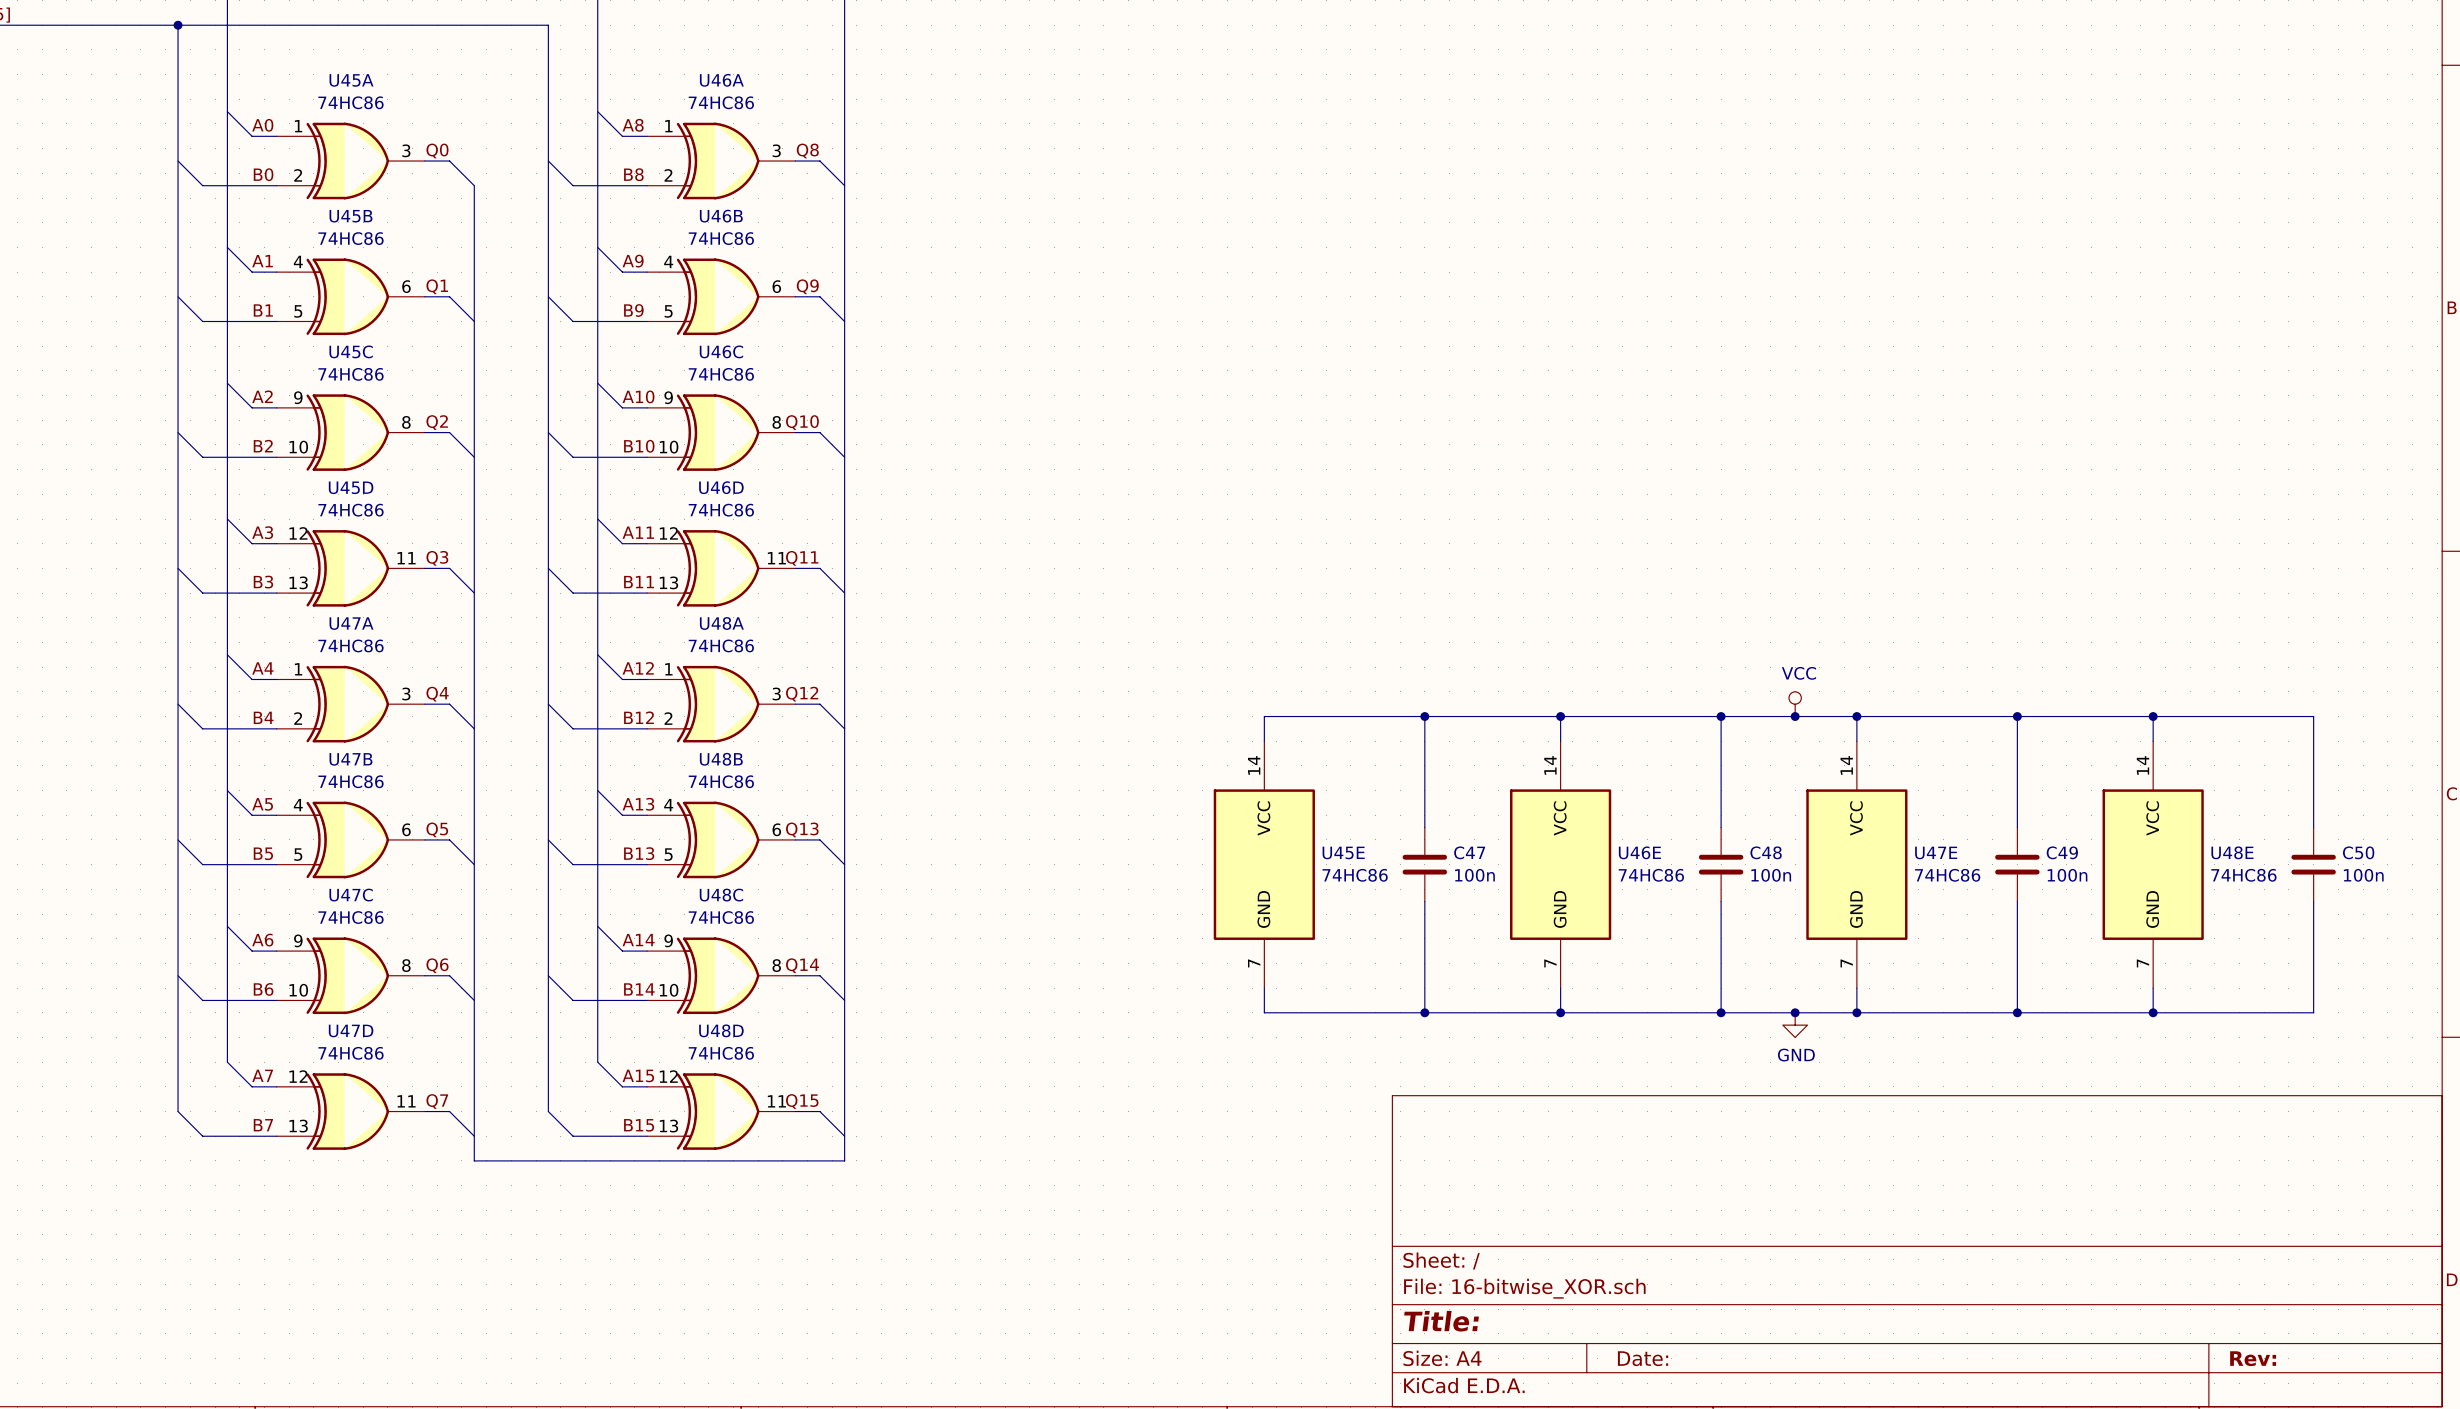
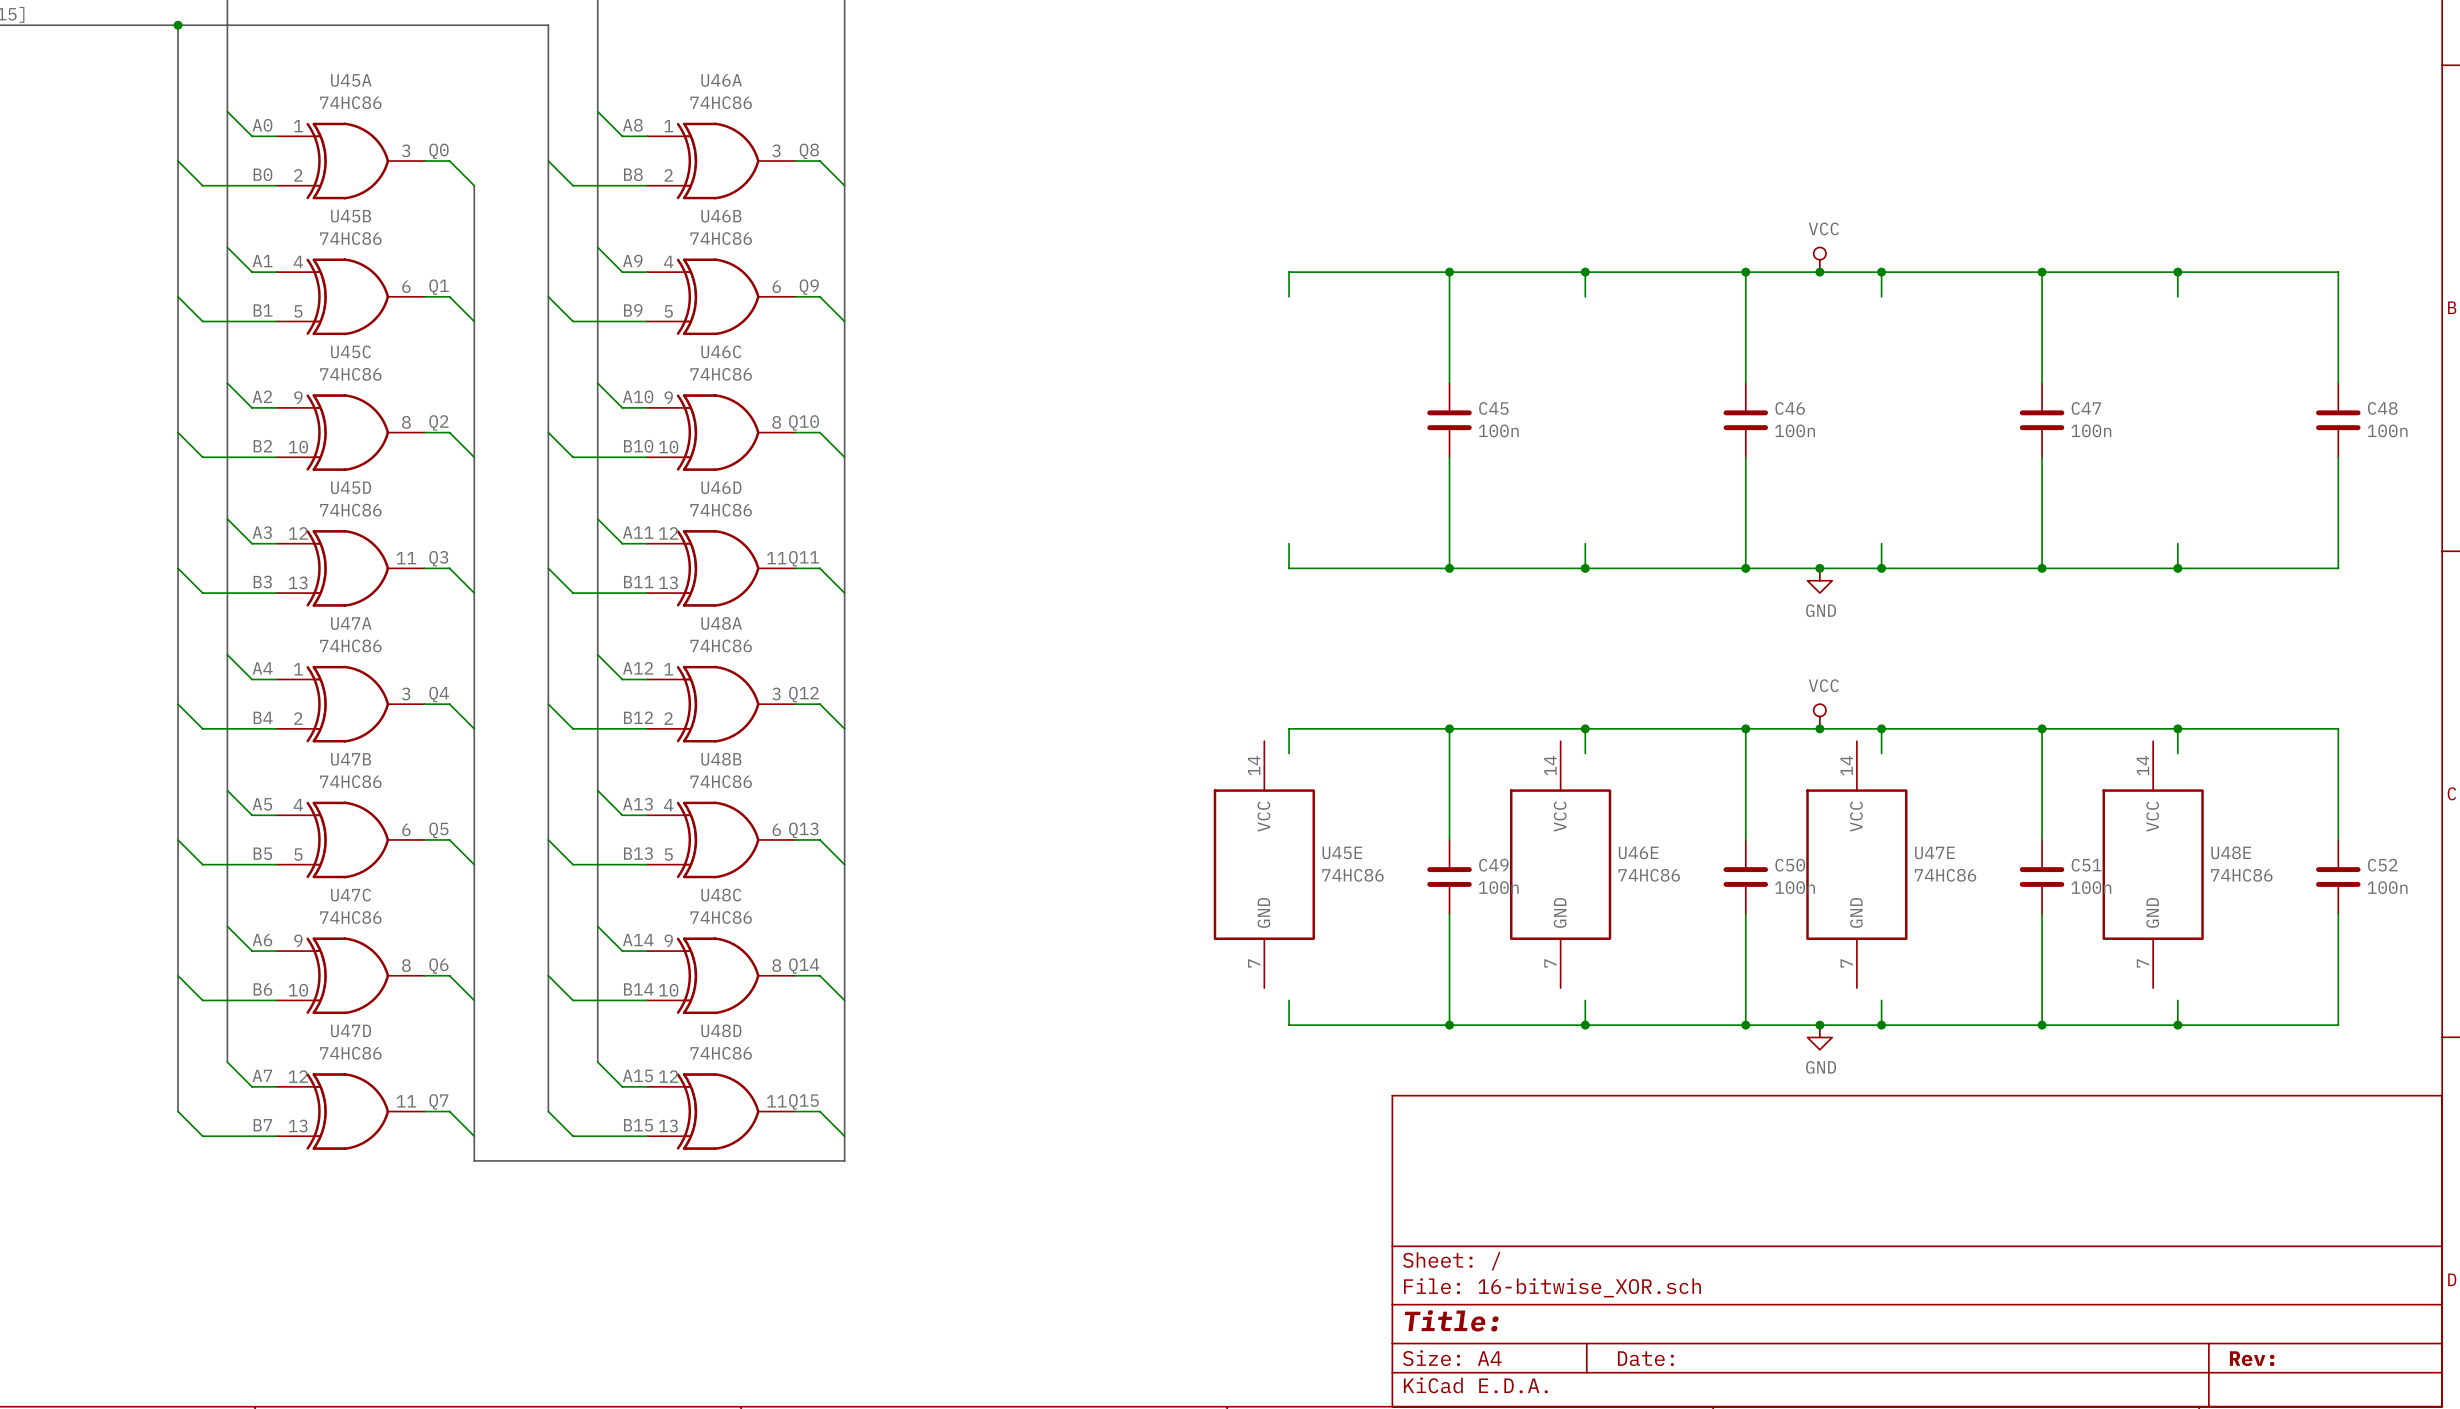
power symbol: none -> VCC (1819, 259)
wire: none -> (1449, 272) (1449, 383)
junction: none -> (1449, 272)
wire: none -> (1585, 272) (1585, 296)
junction: none -> (1585, 272)
wire: none -> (1745, 272) (1745, 383)
junction: none -> (1745, 272)
junction: none -> (1819, 272)
wire: none -> (1881, 272) (1881, 296)
junction: none -> (1881, 272)
wire: none -> (2042, 272) (2042, 383)
junction: none -> (2042, 272)
wire: none -> (2177, 272) (2177, 296)
junction: none -> (2177, 272)
wire: none -> (1289, 296) (1289, 272) (2338, 272) (2338, 383)
C45: none -> 100n (1449, 420)
C46: none -> 100n (1745, 420)
wire: none -> (1449, 457) (1449, 568)
wire: none -> (1745, 457) (1745, 568)
wire: none -> (2042, 457) (2042, 568)
wire: none -> (2338, 457) (2338, 568) (1289, 568) (1289, 543)
wire: none -> (1585, 543) (1585, 568)
wire: none -> (1881, 543) (1881, 568)
wire: none -> (2177, 543) (2177, 568)
junction: none -> (1449, 568)
junction: none -> (1585, 568)
junction: none -> (1745, 568)
junction: none -> (1819, 568)
junction: none -> (1881, 568)
junction: none -> (2042, 568)
junction: none -> (2177, 568)
power symbol: none -> GND (1819, 580)
power symbol position: VCC (1795, 704) -> VCC (1819, 716)
wire: (1424, 716) (1424, 827) -> (1449, 728) (1449, 839)
junction position: (1424, 716) -> (1449, 728)
wire: (1560, 716) (1560, 741) -> (1585, 728) (1585, 753)
junction position: (1560, 716) -> (1585, 728)
wire: (1721, 716) (1721, 827) -> (1745, 728) (1745, 839)
junction: (1721, 716) -> none
junction: (1795, 716) -> none
wire: (1856, 716) (1856, 741) -> (1881, 728) (1881, 753)
junction: (1856, 716) -> none
wire: (2017, 716) (2017, 827) -> (2042, 728) (2042, 839)
junction position: (2017, 716) -> (2042, 728)
wire: (2153, 716) (2153, 741) -> (2177, 728) (2177, 753)
junction position: (2153, 716) -> (2177, 728)
junction: none -> (1745, 728)
junction: none -> (1819, 728)
junction: none -> (1881, 728)
wire: (1264, 741) (1264, 716) (2313, 716) (2313, 827) -> (1289, 753) (1289, 728) (2338, 728) (2338, 839)
C47 position: (1424, 864) -> (2042, 420)
C48 position: (1721, 864) -> (2338, 420)
C49 position: (2017, 864) -> (1449, 877)
C50 position: (2313, 864) -> (1745, 877)
C51: none -> 100n (2042, 877)
C52: none -> 100n (2338, 877)
wire: (1424, 901) (1424, 1012) -> (1449, 914) (1449, 1025)
wire: (1721, 901) (1721, 1012) -> (1745, 914) (1745, 1025)
wire: (2017, 901) (2017, 1012) -> (2042, 914) (2042, 1025)
wire: (2313, 901) (2313, 1012) (1264, 1012) (1264, 988) -> (2338, 914) (2338, 1025) (1289, 1025) (1289, 1000)
wire: (1560, 988) (1560, 1012) -> (1585, 1000) (1585, 1025)
wire: (1856, 988) (1856, 1012) -> (1881, 1000) (1881, 1025)
wire: (2153, 988) (2153, 1012) -> (2177, 1000) (2177, 1025)
junction position: (1424, 1012) -> (1449, 1025)
junction position: (1560, 1012) -> (1585, 1025)
junction: (1721, 1012) -> none
junction: (1795, 1012) -> none
junction: (1856, 1012) -> none
junction position: (2017, 1012) -> (2042, 1025)
junction position: (2153, 1012) -> (2177, 1025)
junction: none -> (1745, 1025)
power symbol position: GND (1795, 1025) -> GND (1819, 1037)
junction: none -> (1819, 1025)
junction: none -> (1881, 1025)

